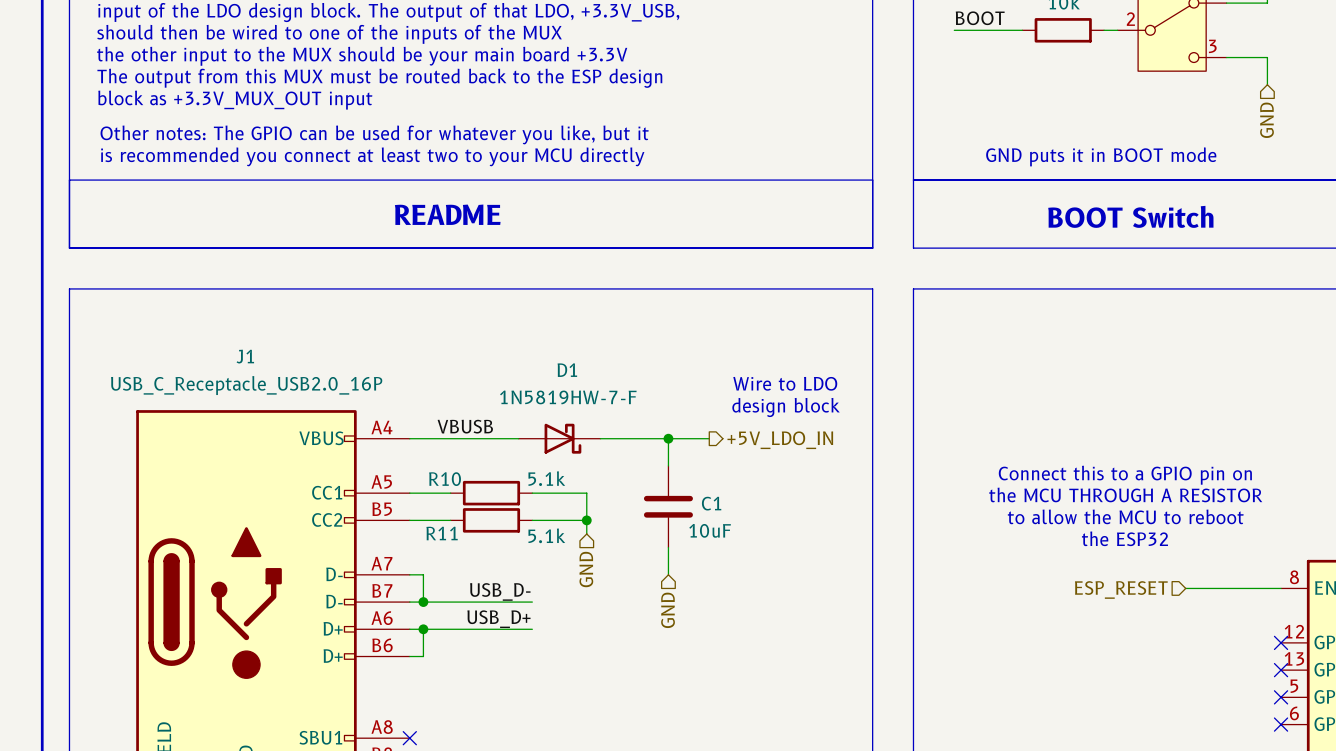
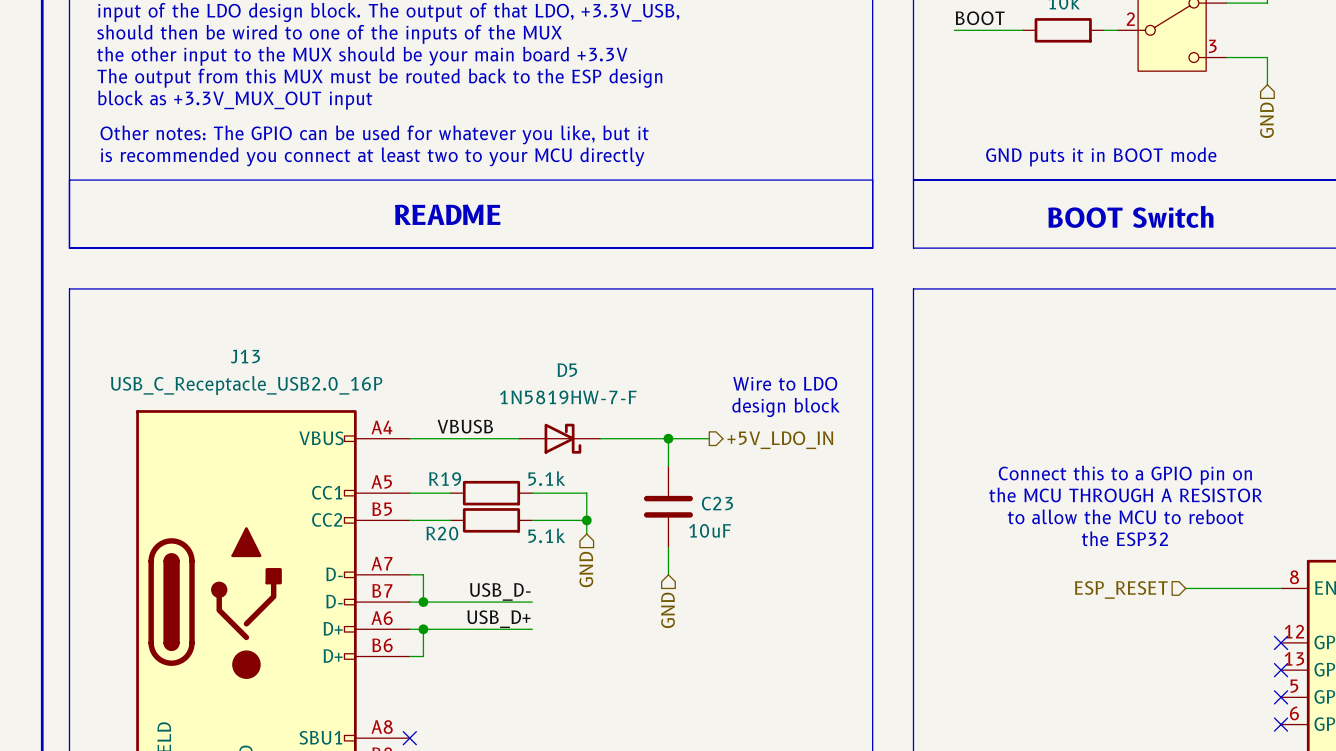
J1 name: J1 (245, 356) -> J13 (245, 356)
D1 name: D1 (567, 370) -> D5 (567, 370)
R10 name: R10 (445, 479) -> R19 (445, 479)
C1 name: C1 (711, 503) -> C23 (717, 503)
R11 name: R11 (442, 533) -> R20 (442, 533)

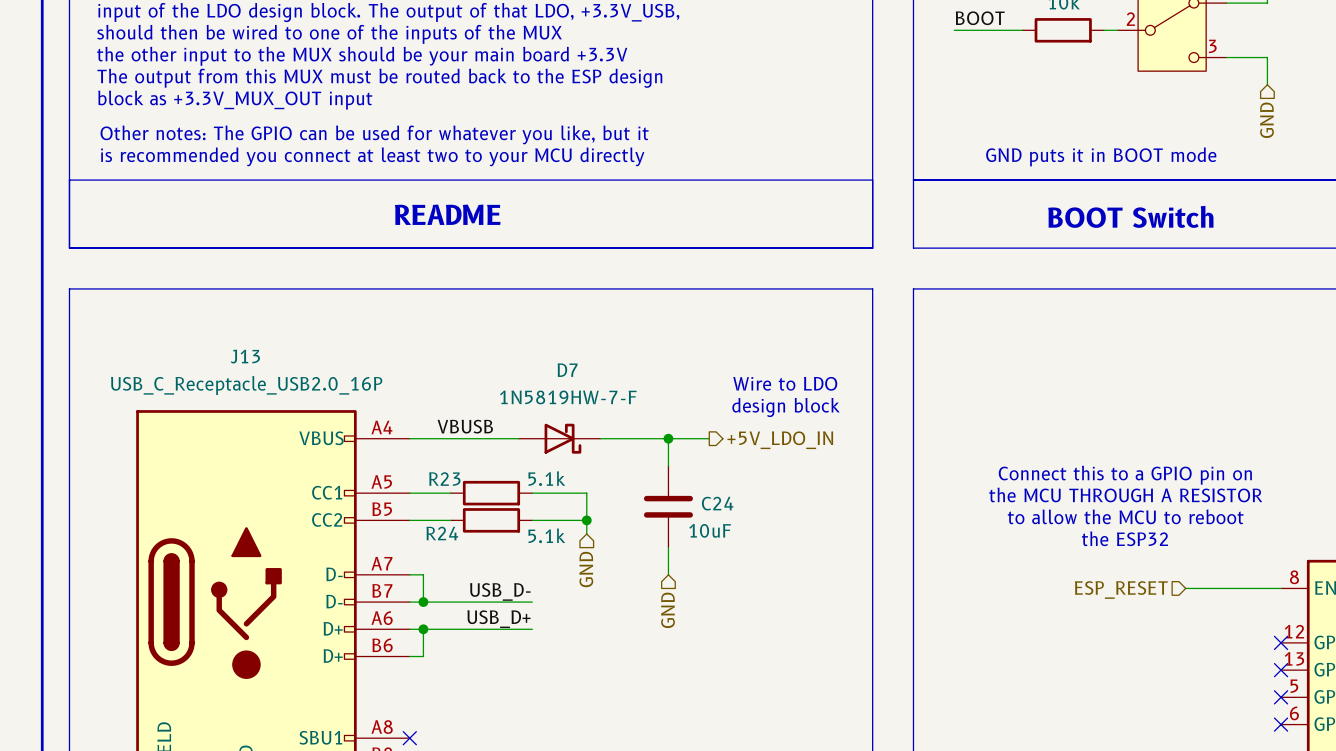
D5 name: D5 (567, 370) -> D7 (567, 370)
R19 name: R19 (445, 479) -> R23 (444, 479)
C23 name: C23 (717, 503) -> C24 (717, 503)
R20 name: R20 (442, 533) -> R24 (442, 533)

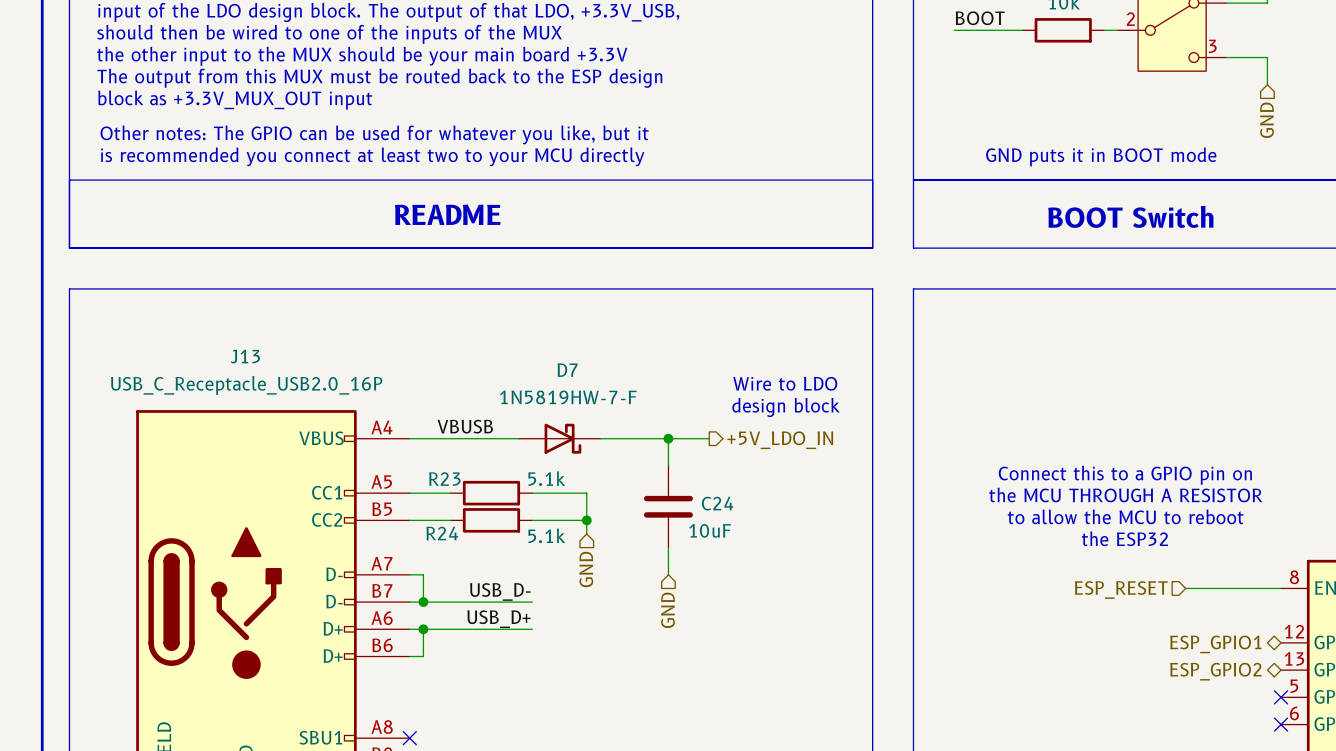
no-connect mark: (1281, 642) -> none
hierarchical label: none -> ESP_GPIO1 (1215, 644)
no-connect mark: (1281, 670) -> none
hierarchical label: none -> ESP_GPIO2 (1215, 671)

